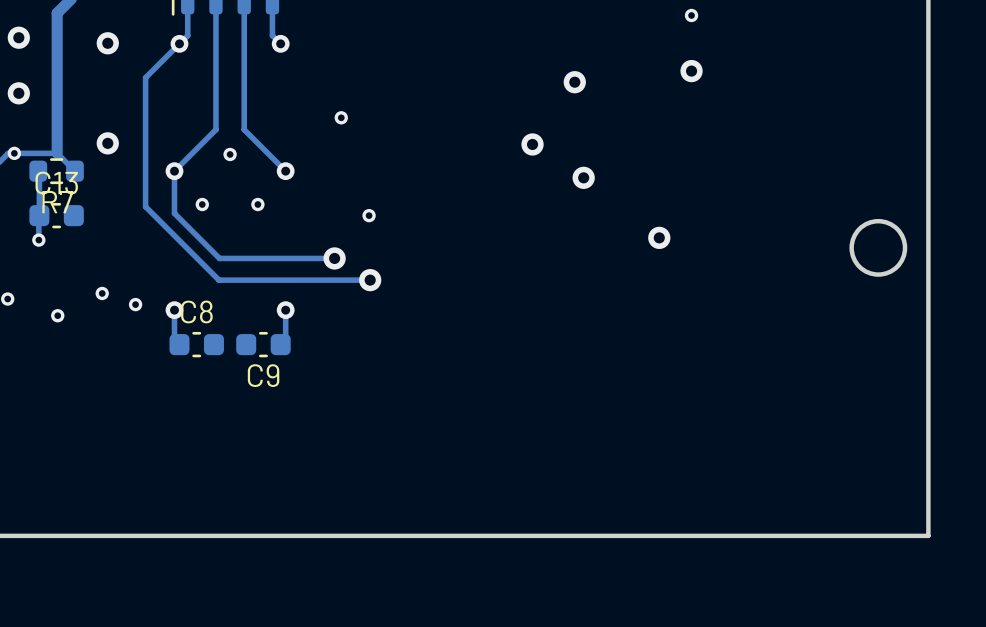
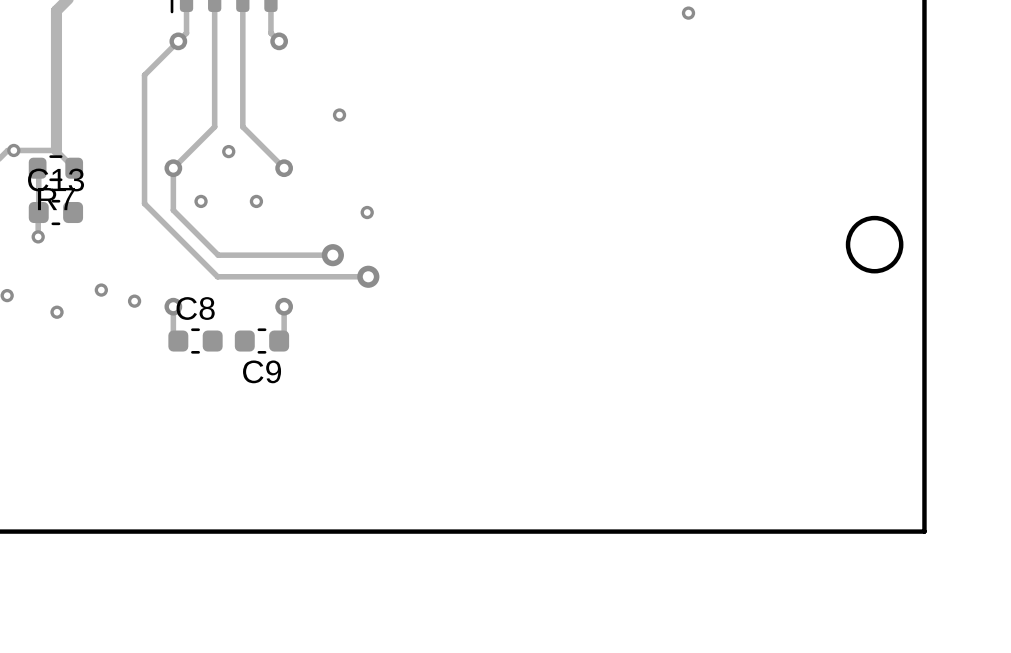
via: (18, 37) -> none
via: (107, 43) -> none
via: (691, 71) -> none
via: (574, 82) -> none
via: (18, 93) -> none
via: (107, 143) -> none
via: (532, 144) -> none
via: (583, 177) -> none
via: (659, 237) -> none

